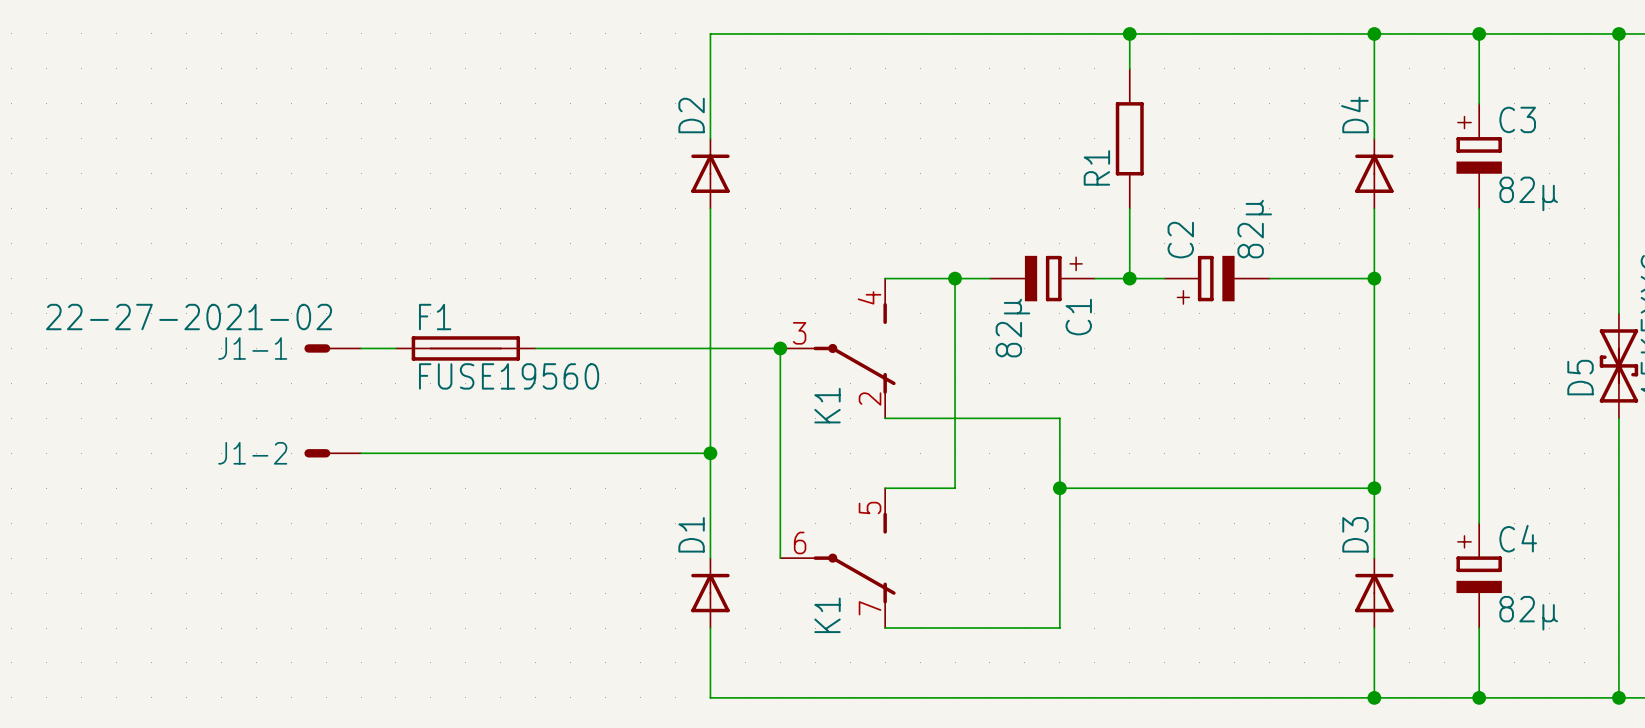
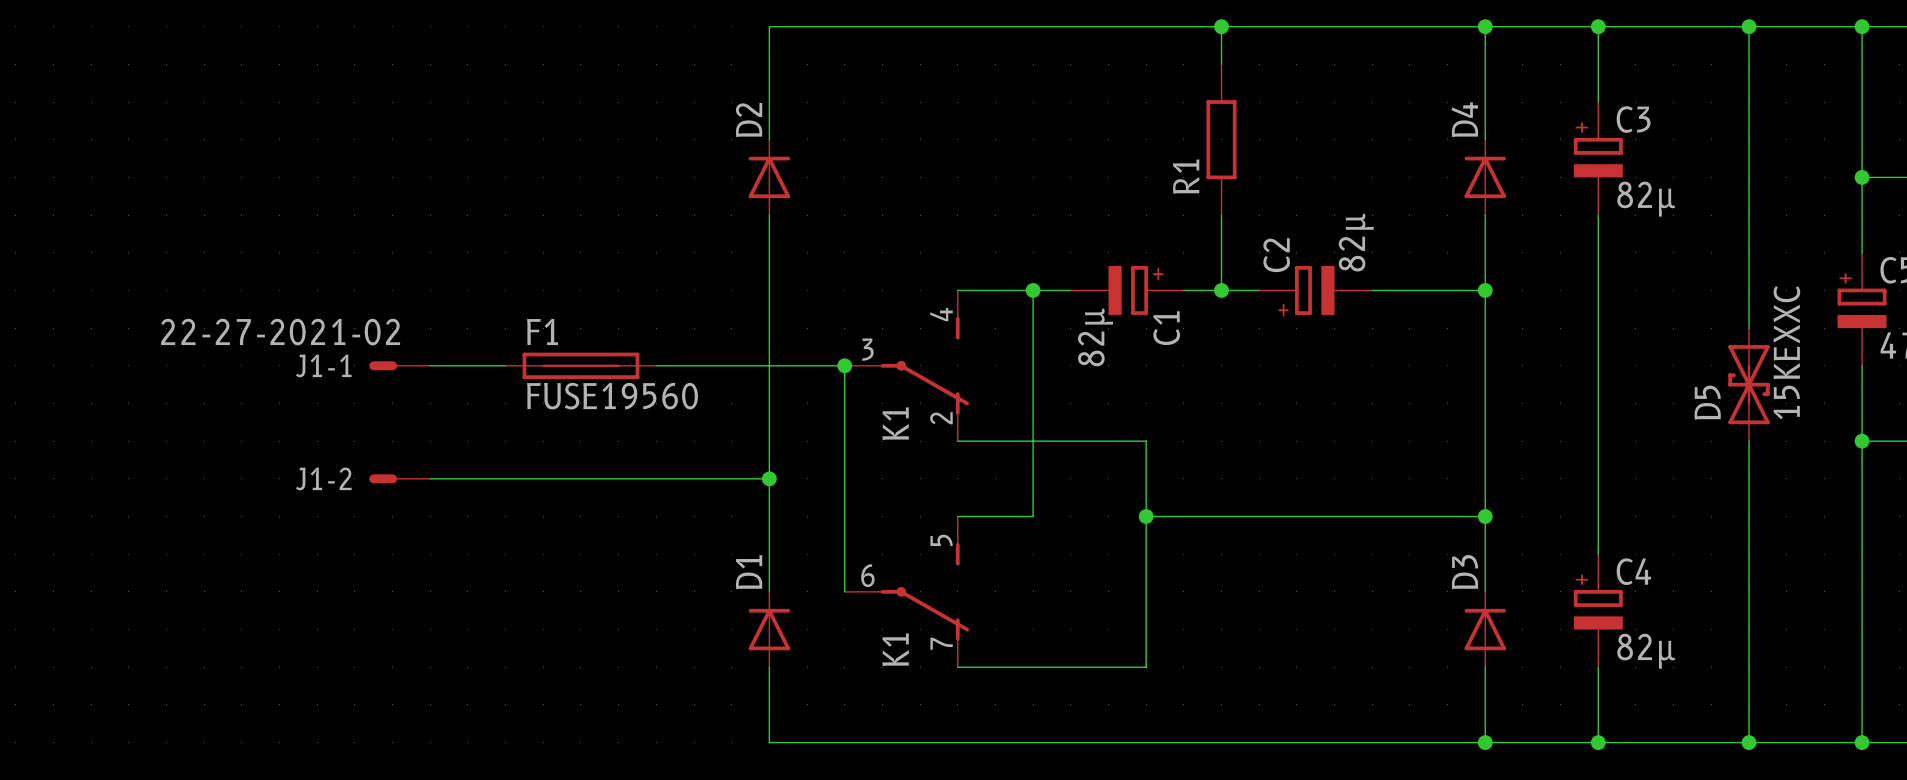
J1-1 position: (332, 348) -> (399, 365)
F1 position: (465, 348) -> (580, 365)
J1-2 position: (332, 453) -> (399, 478)

